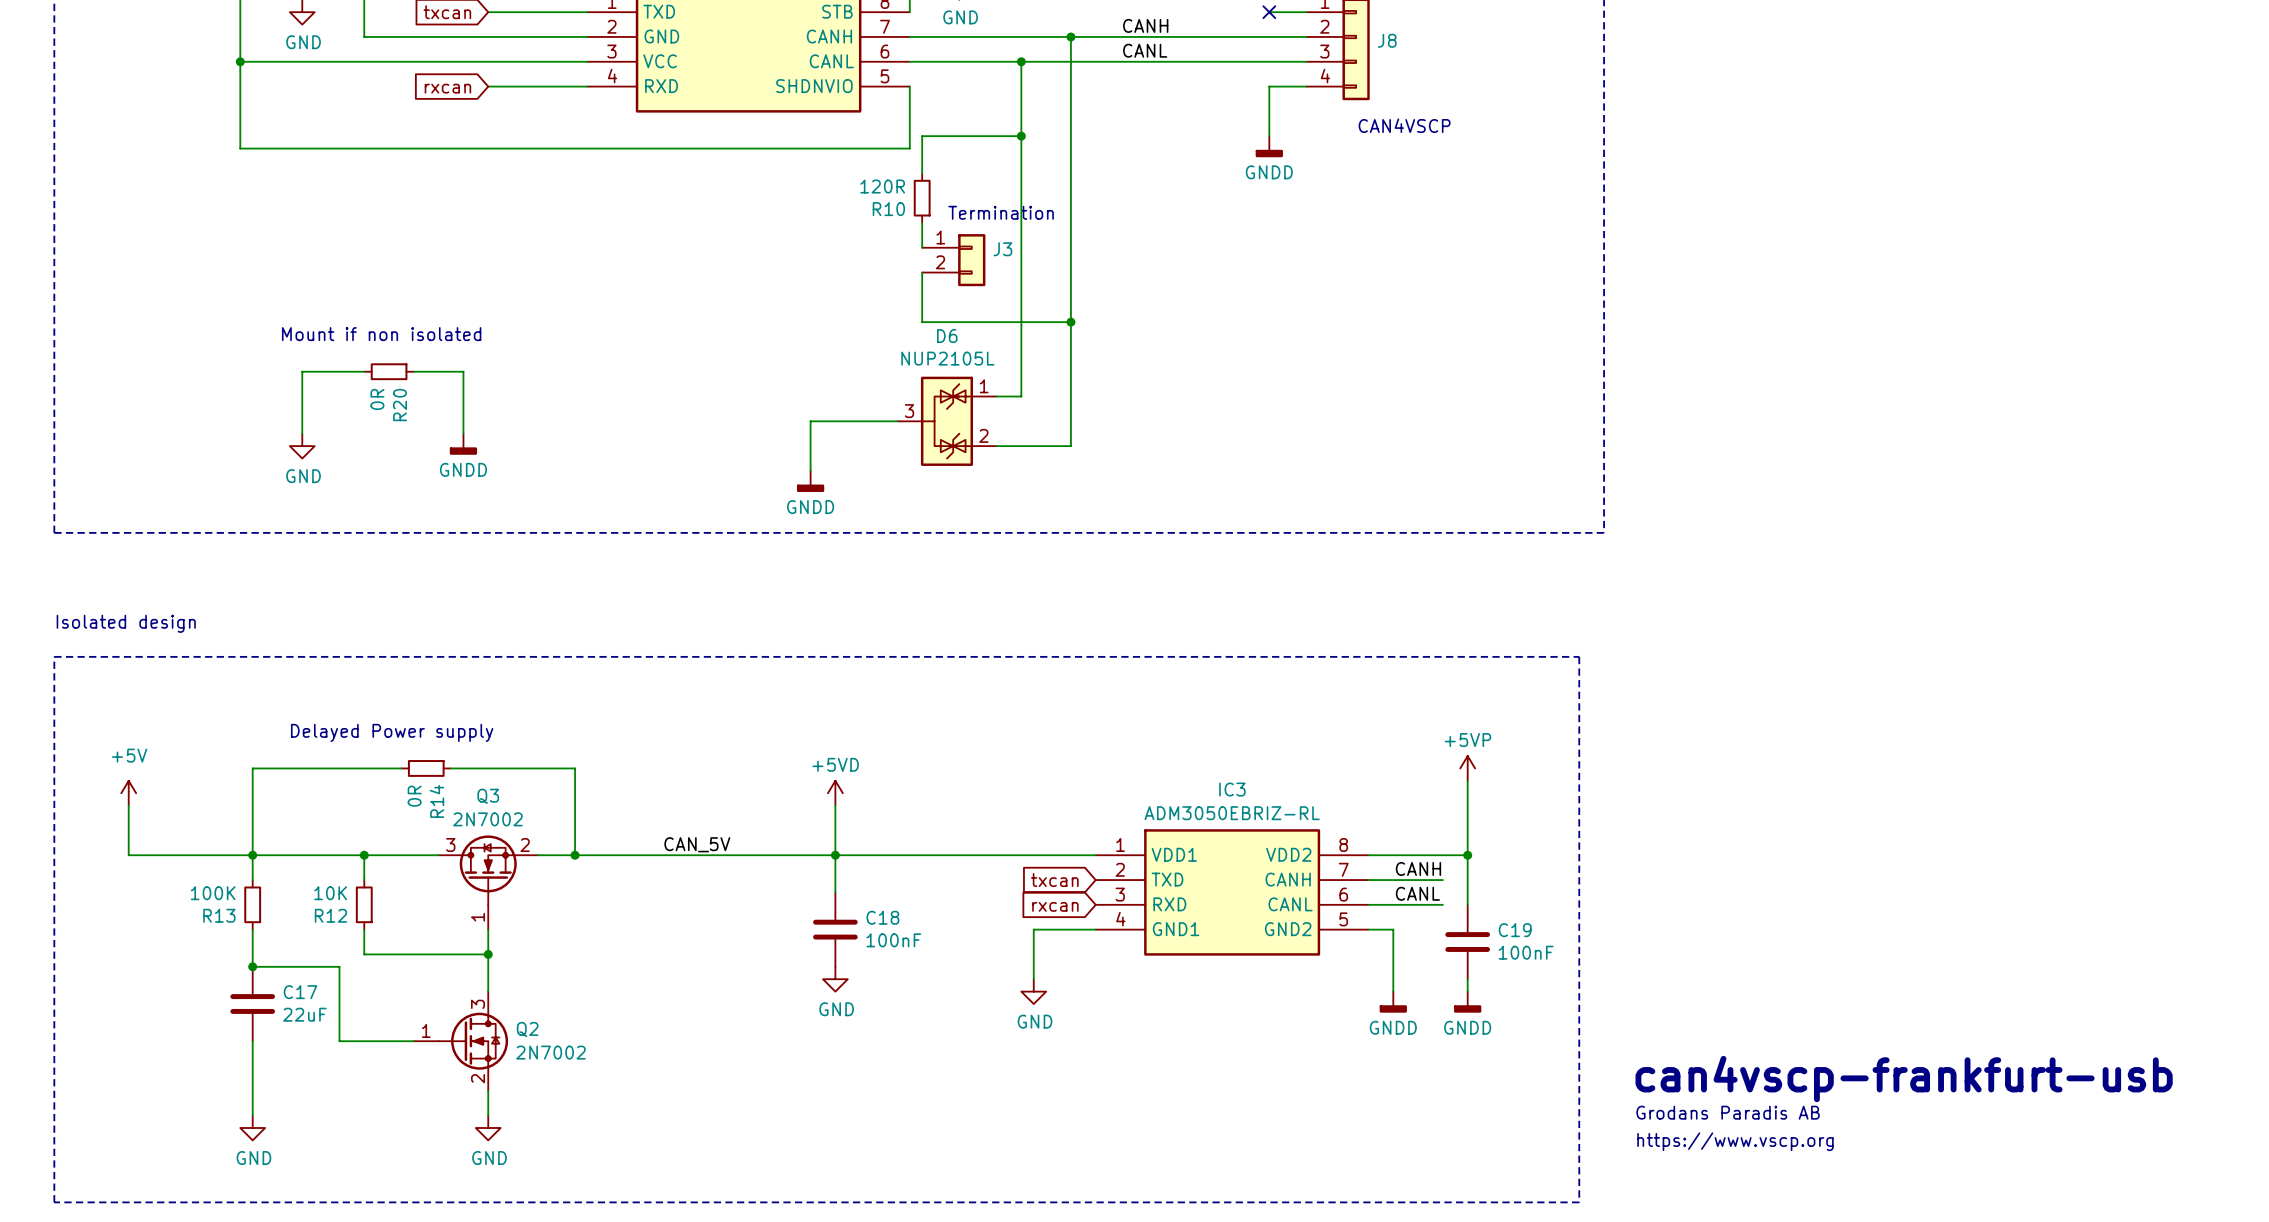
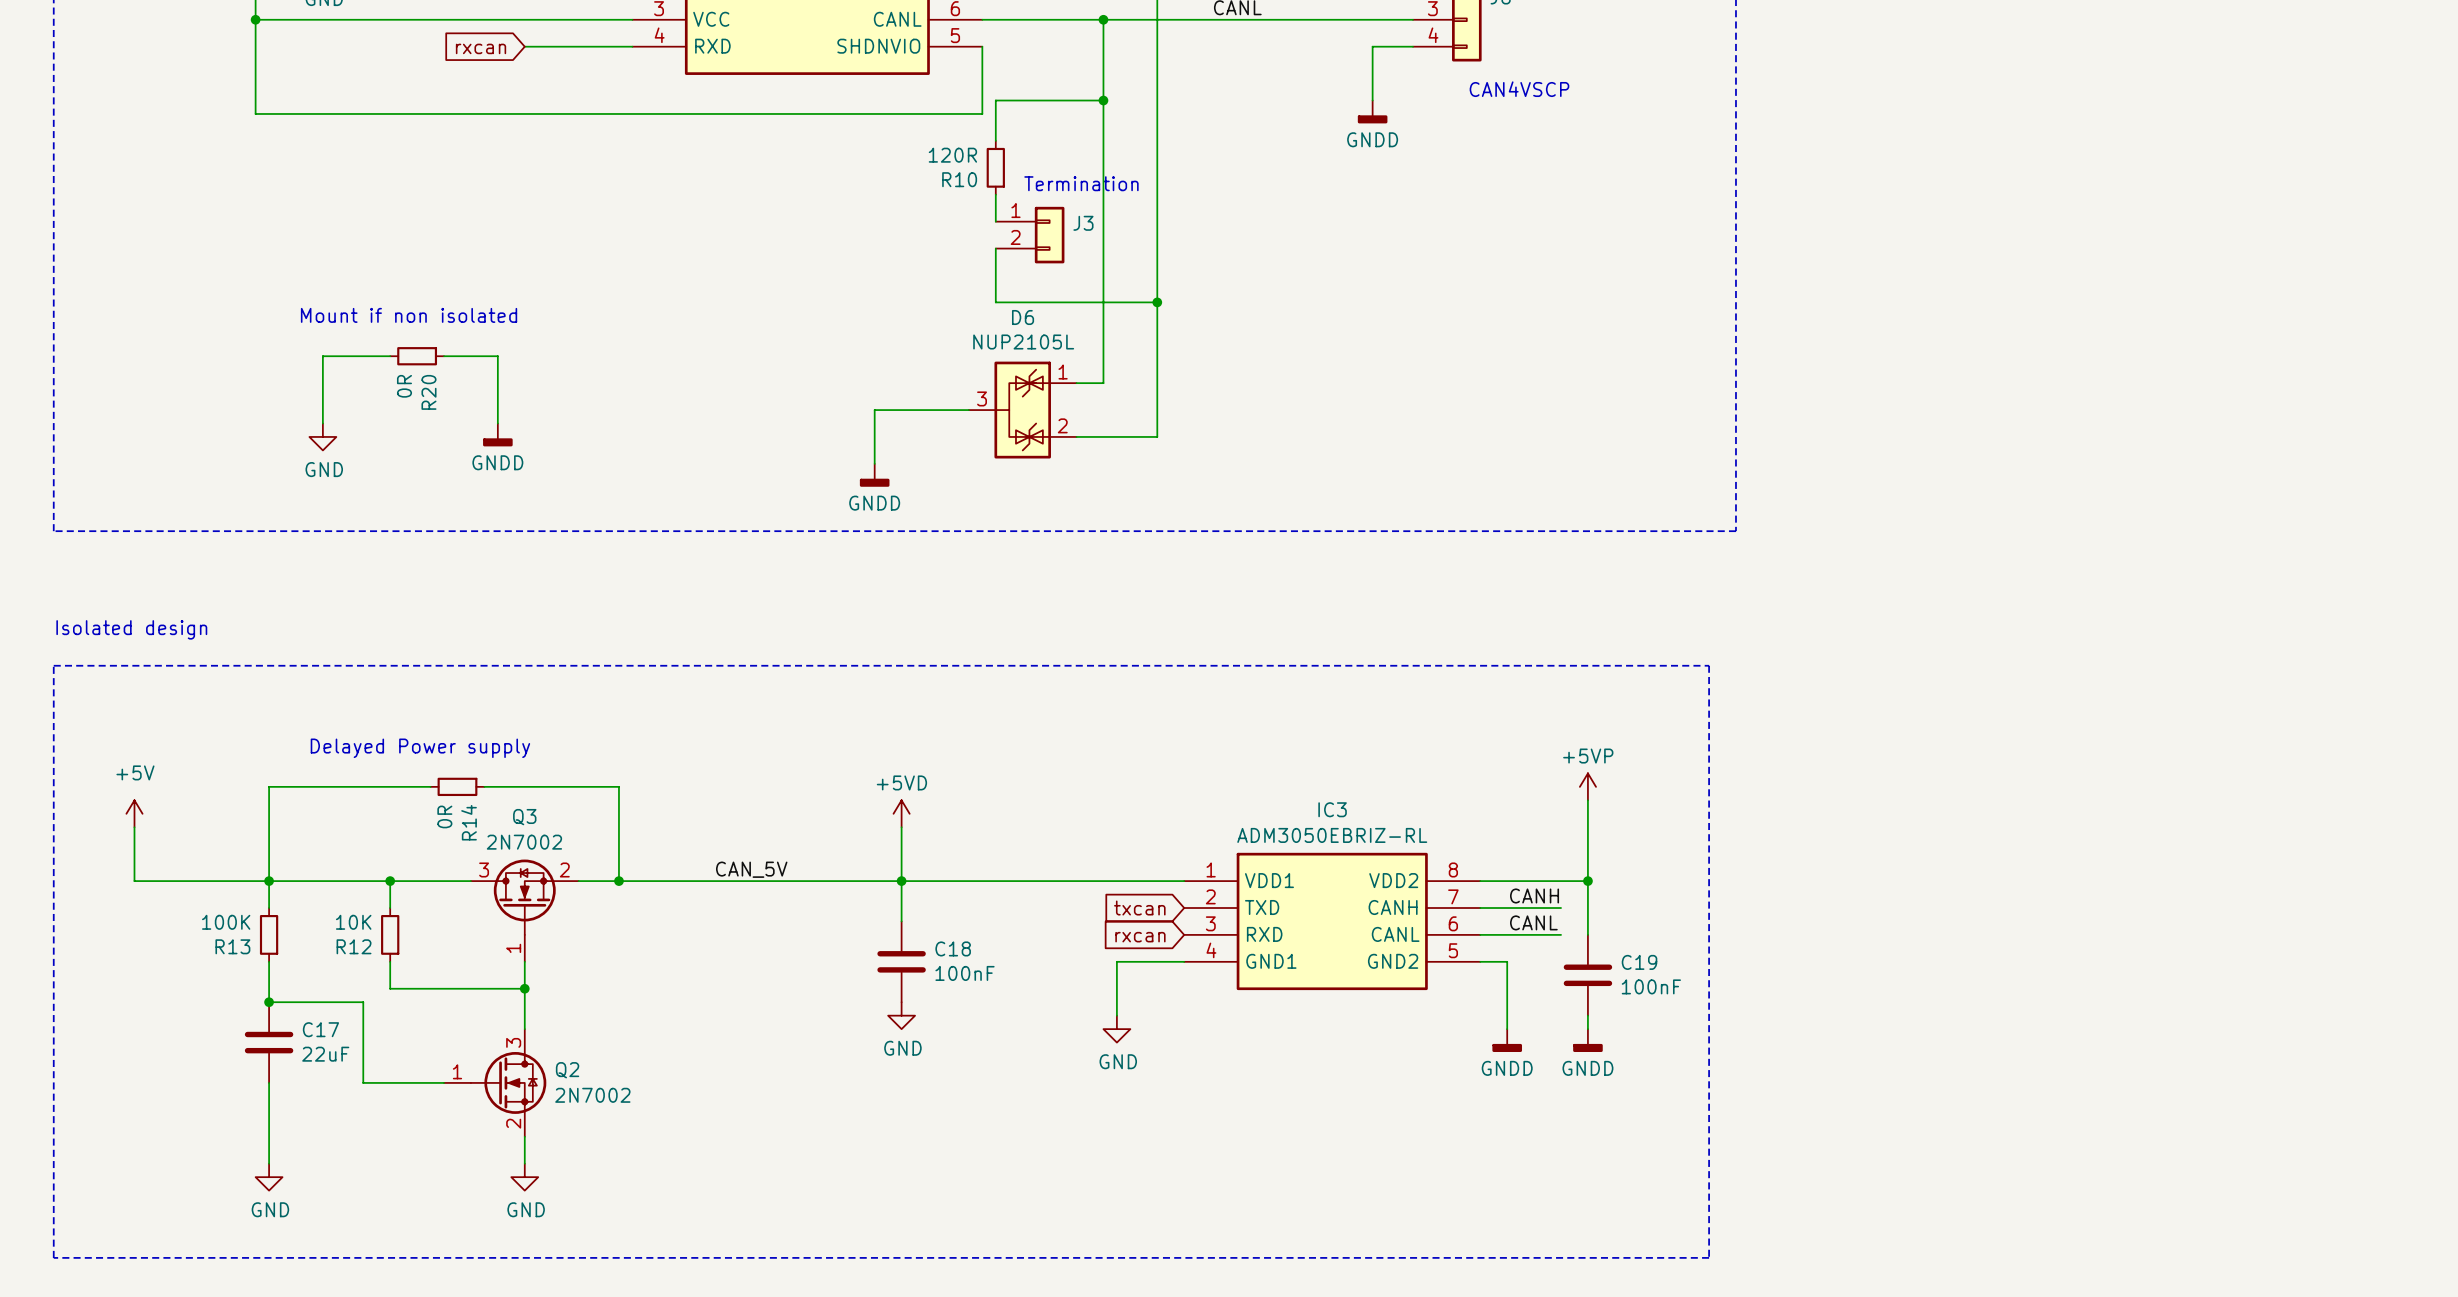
text: can4vscp-frankfurt-usb (1904, 1079) -> none
text: Grodans Paradis AB (1728, 1112) -> none
text: https://www.vscp.org (1735, 1141) -> none

